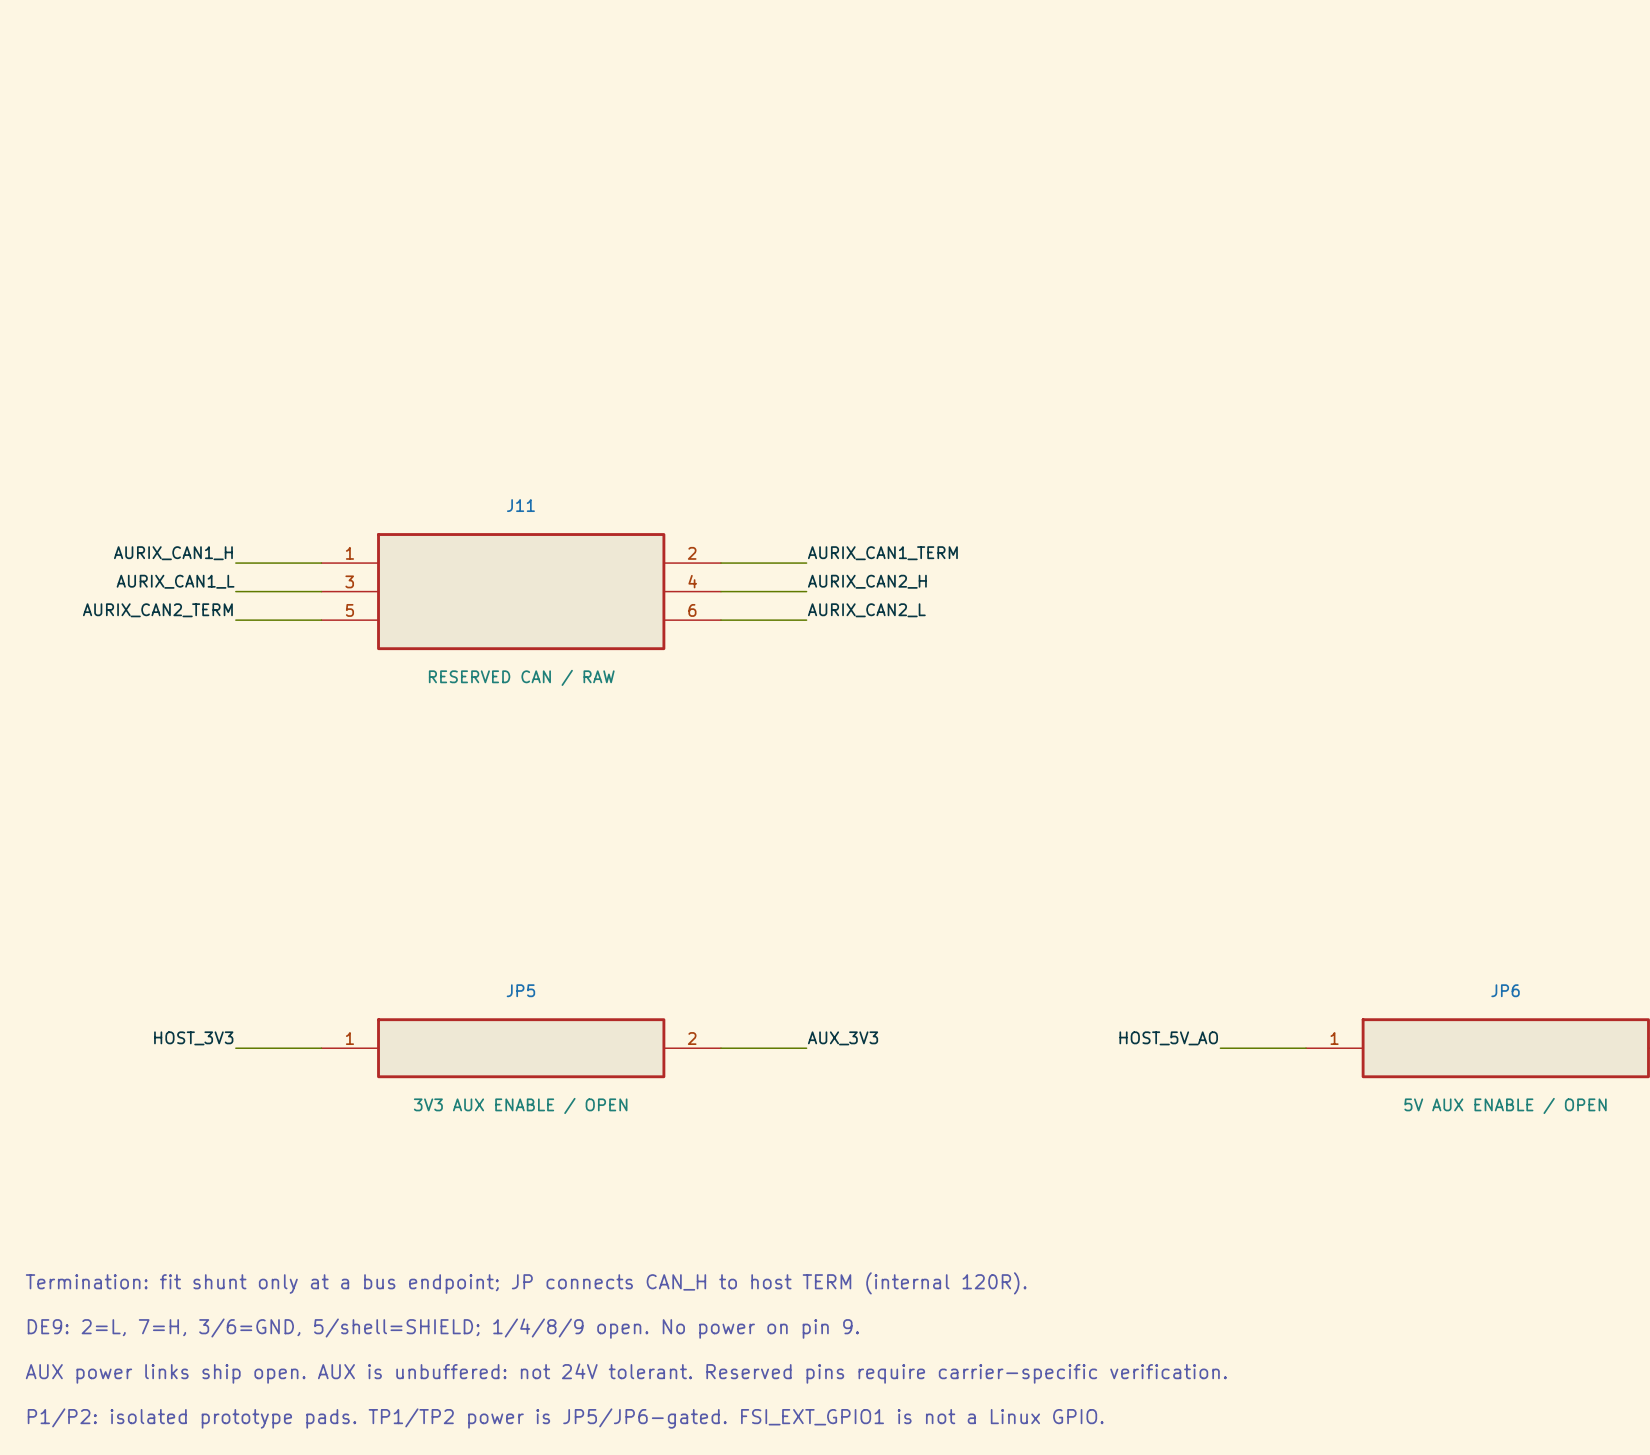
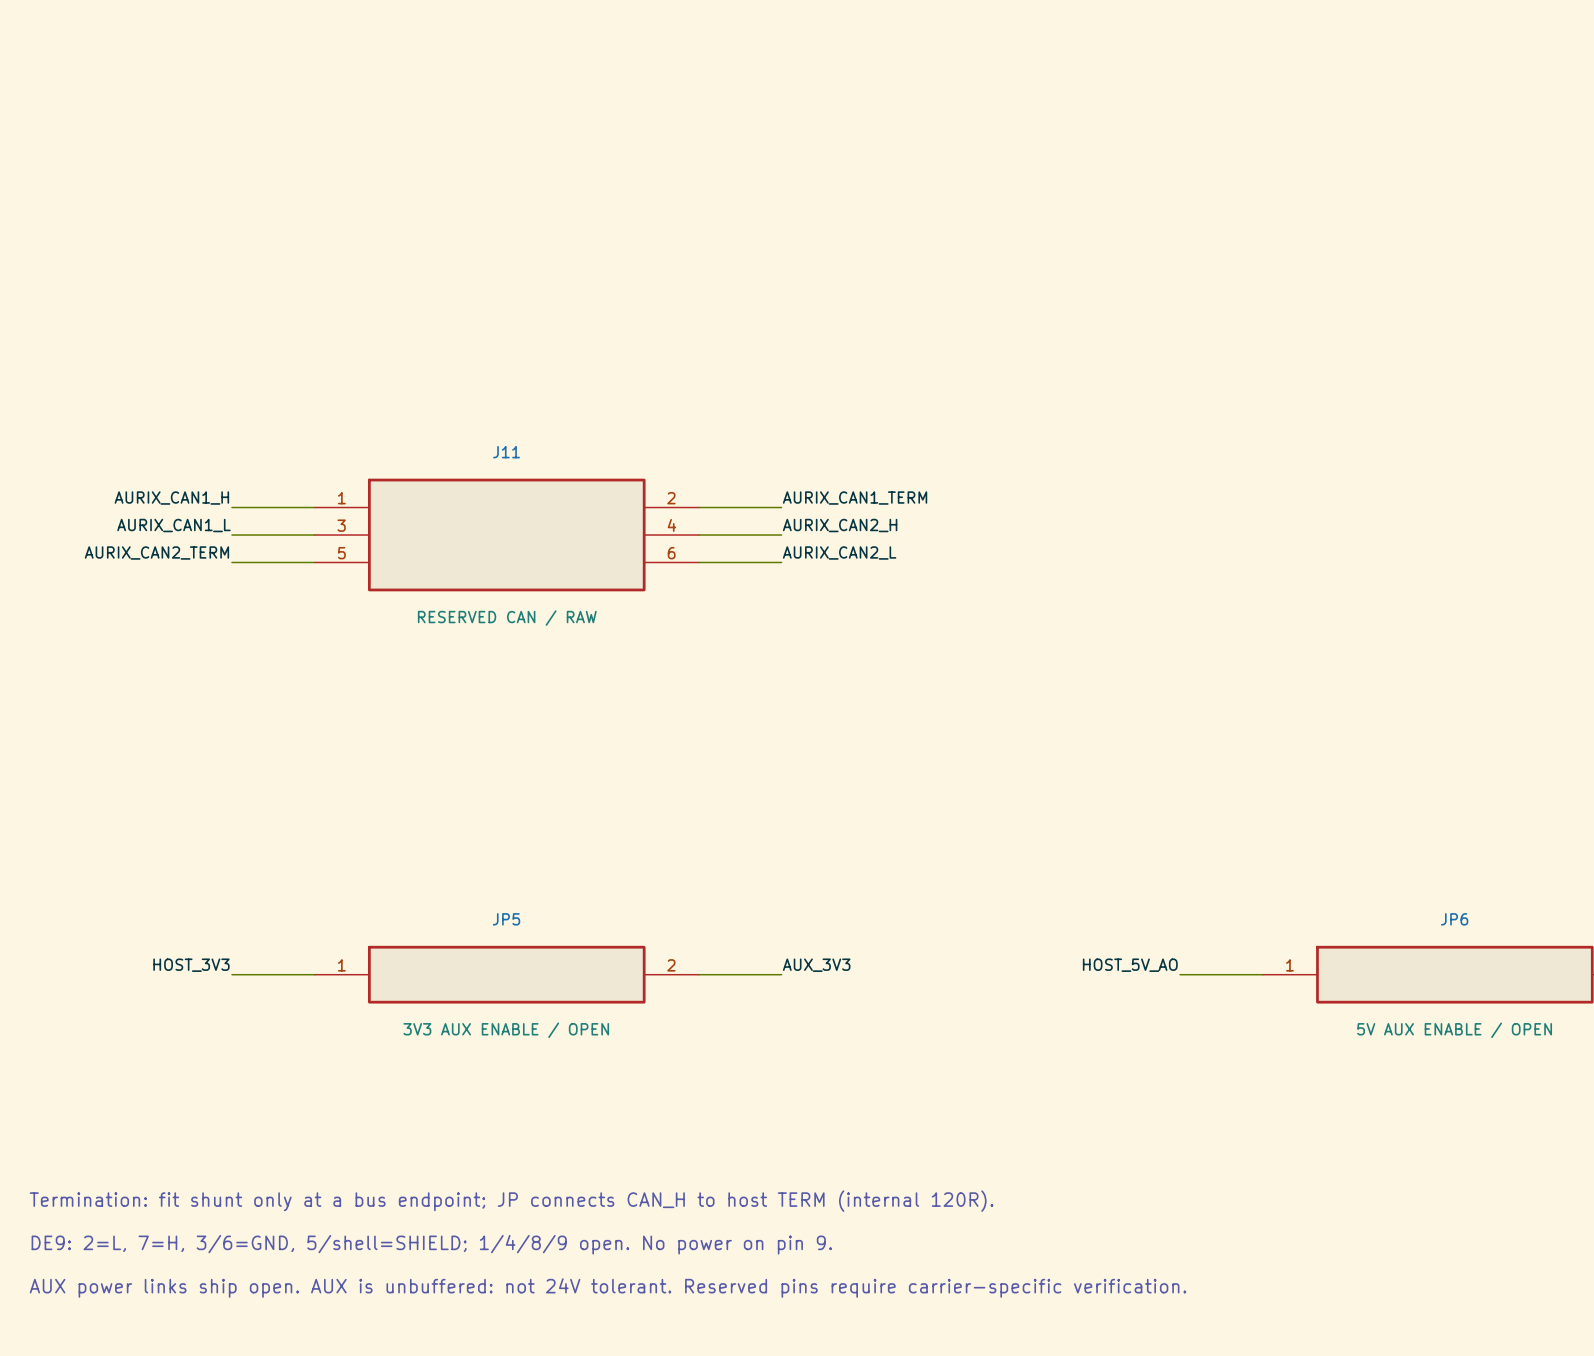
text: P1/P2: isolated prototype pads. TP1/TP2 power is JP5/JP6-gated. FSI_EXT_GPIO1 is not a Linux GPIO. (565, 1418) -> none

